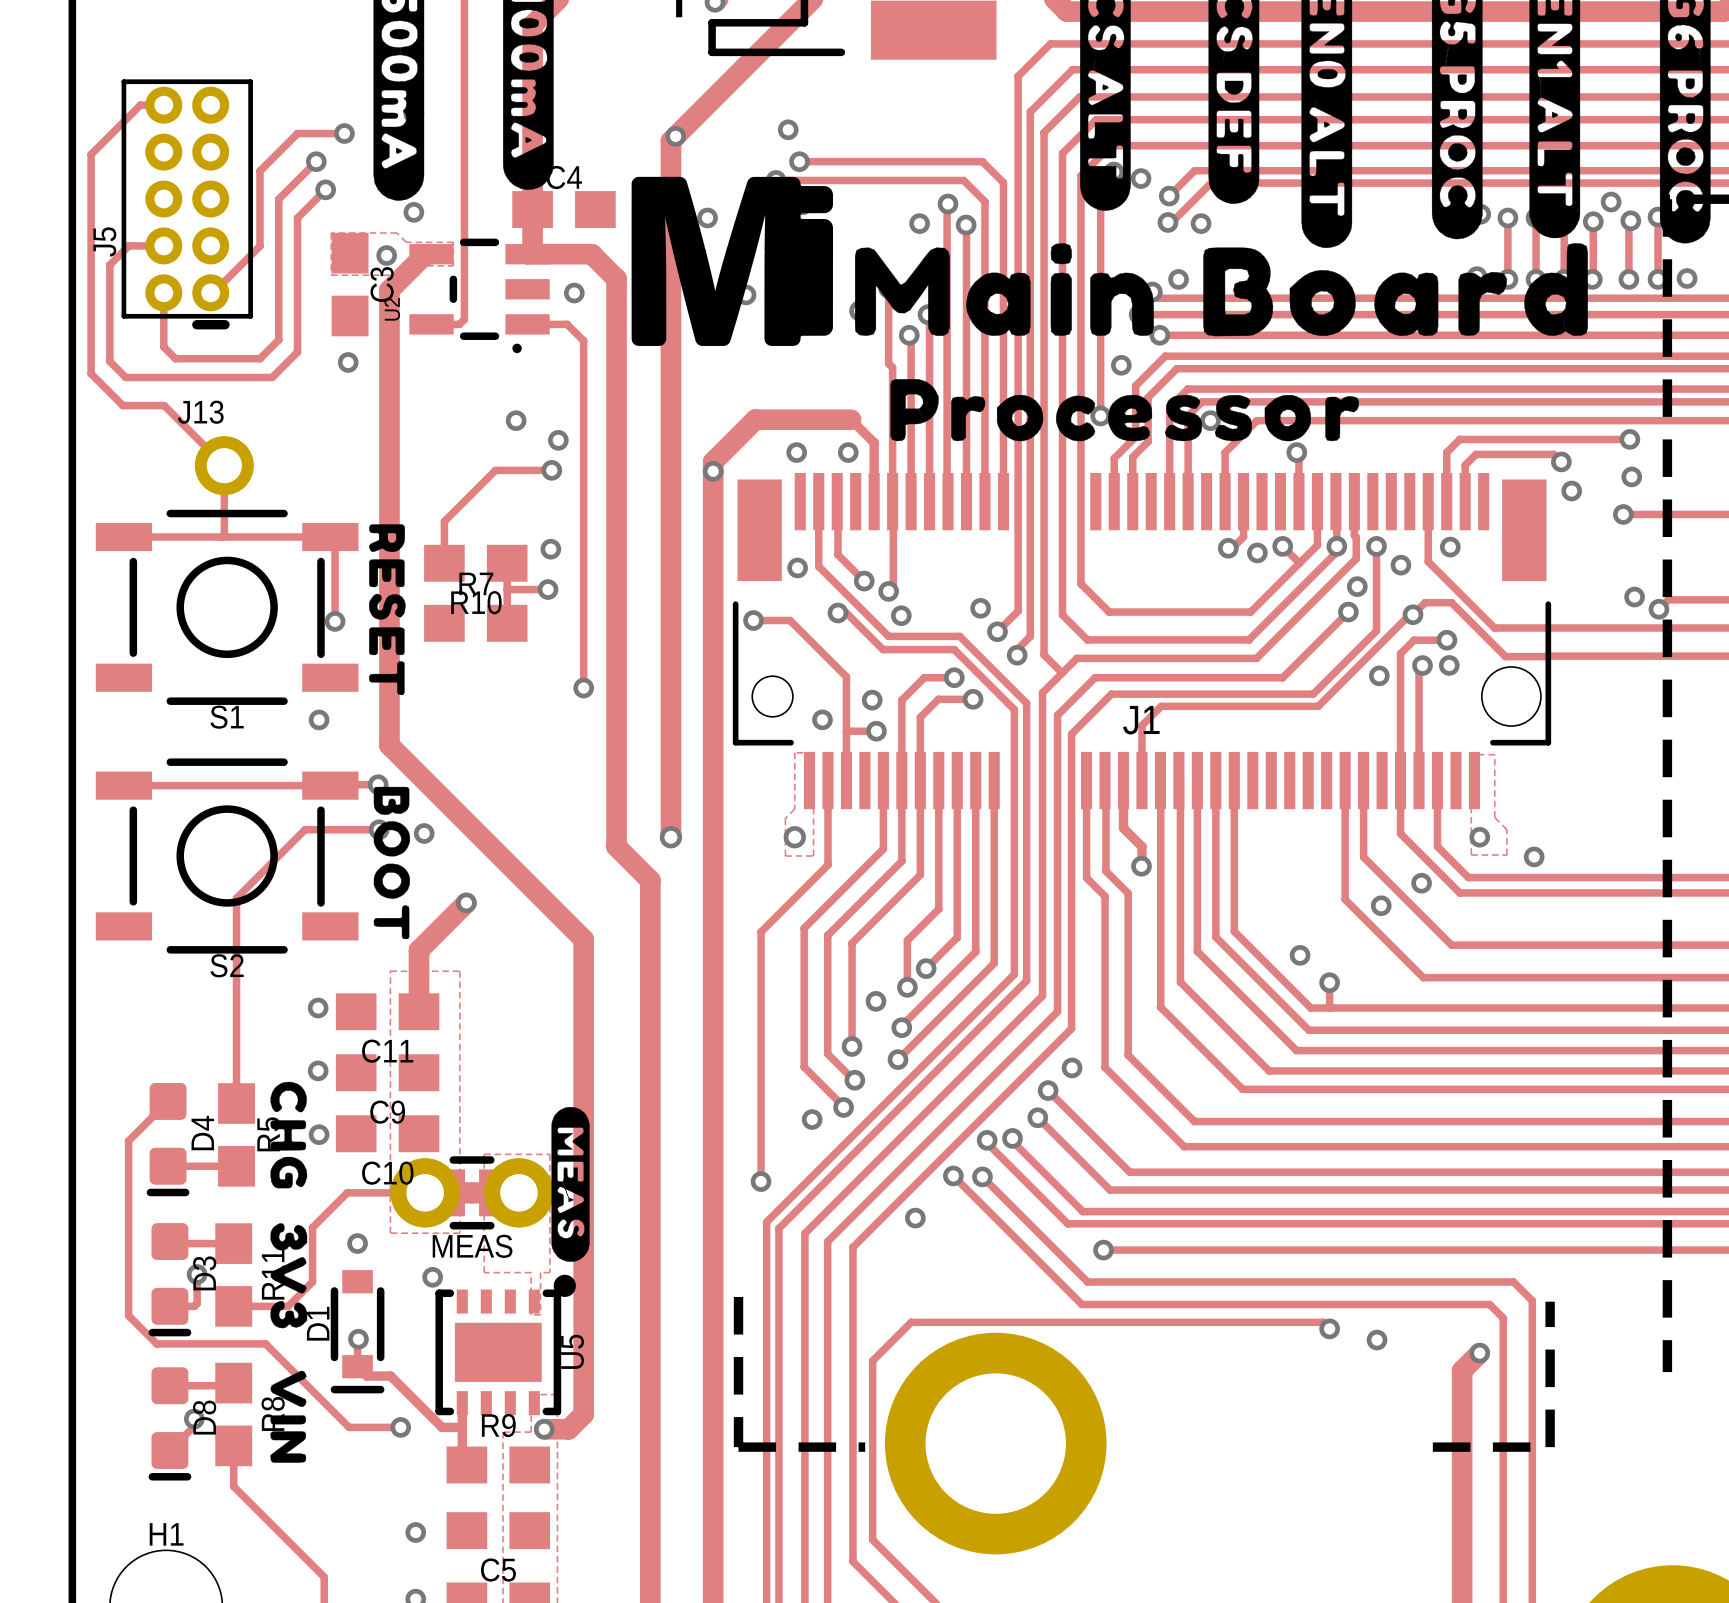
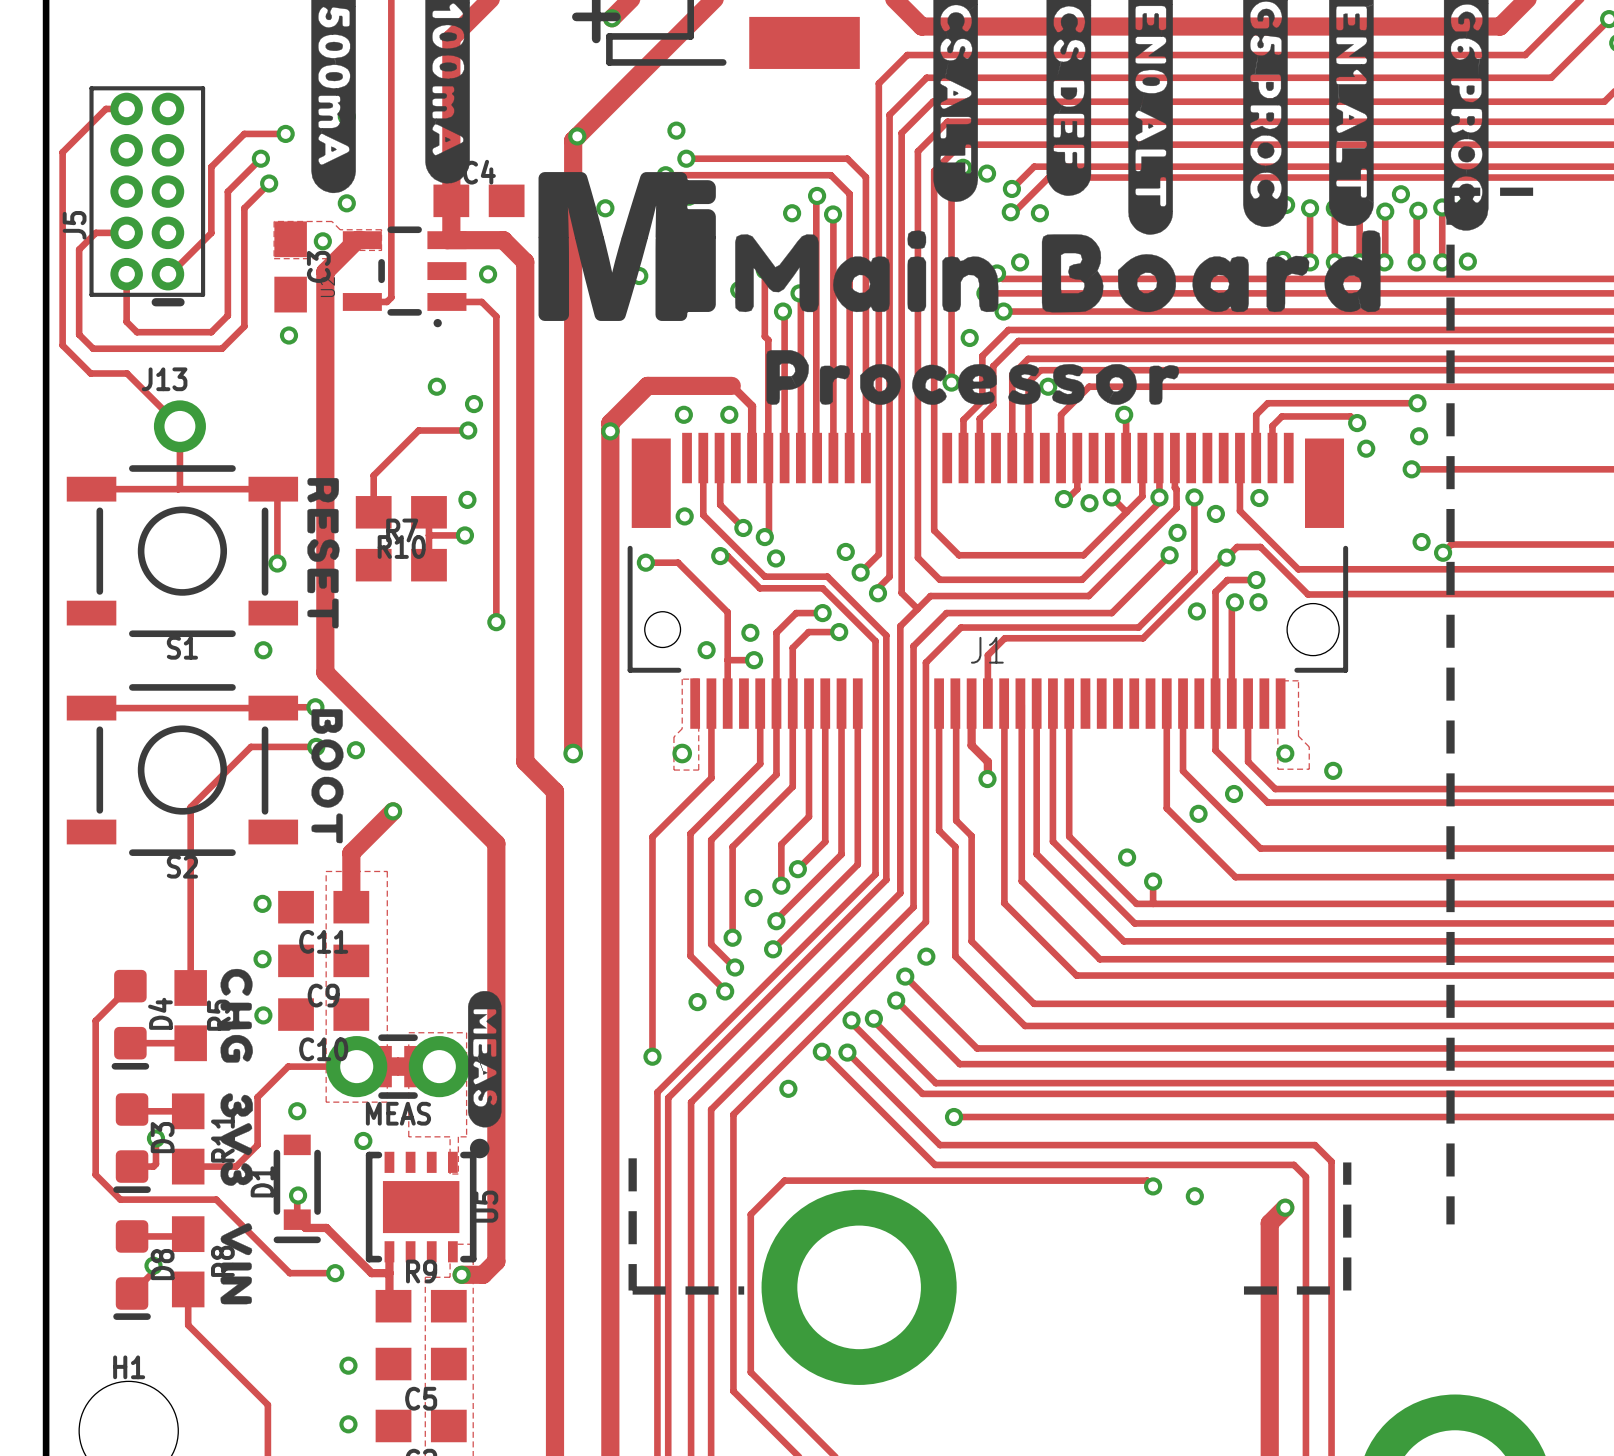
track: (1105, 871) (1128, 893) (1128, 1055) -> (956, 783) (956, 820) (971, 836) (971, 941) (975, 945)
track: (1086, 877) (1105, 896) (1105, 943) -> (939, 789) (939, 830) (955, 846)

